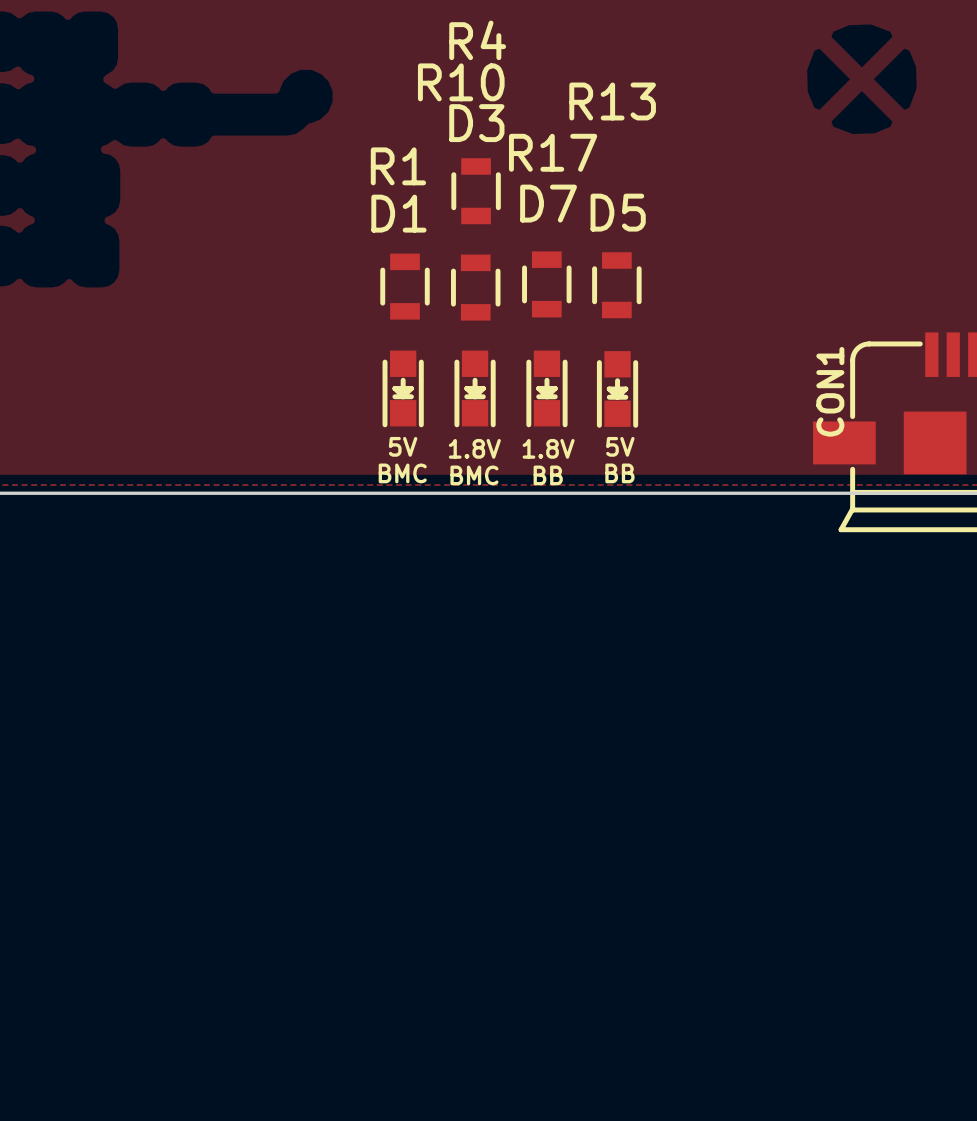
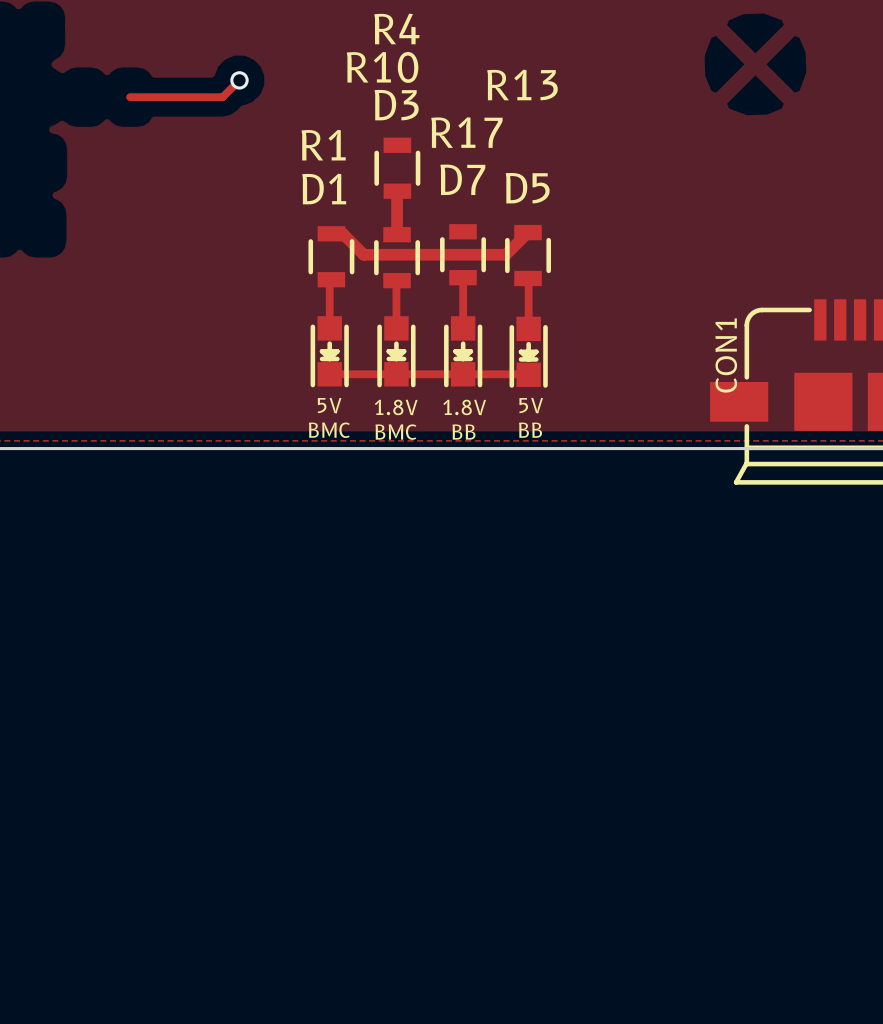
track: none -> (239, 80) (222, 97) (130, 97)
via: none -> (239, 80)
track: none -> (397, 191) (397, 234)
track: none -> (528, 232) (505, 254) (363, 254) (342, 233) (331, 233)
track: none -> (463, 277) (463, 328)
track: none -> (528, 278) (528, 328)
track: none -> (331, 279) (329, 281) (329, 328)
track: none -> (397, 280) (396, 328)
track: none -> (329, 374) (528, 374)

